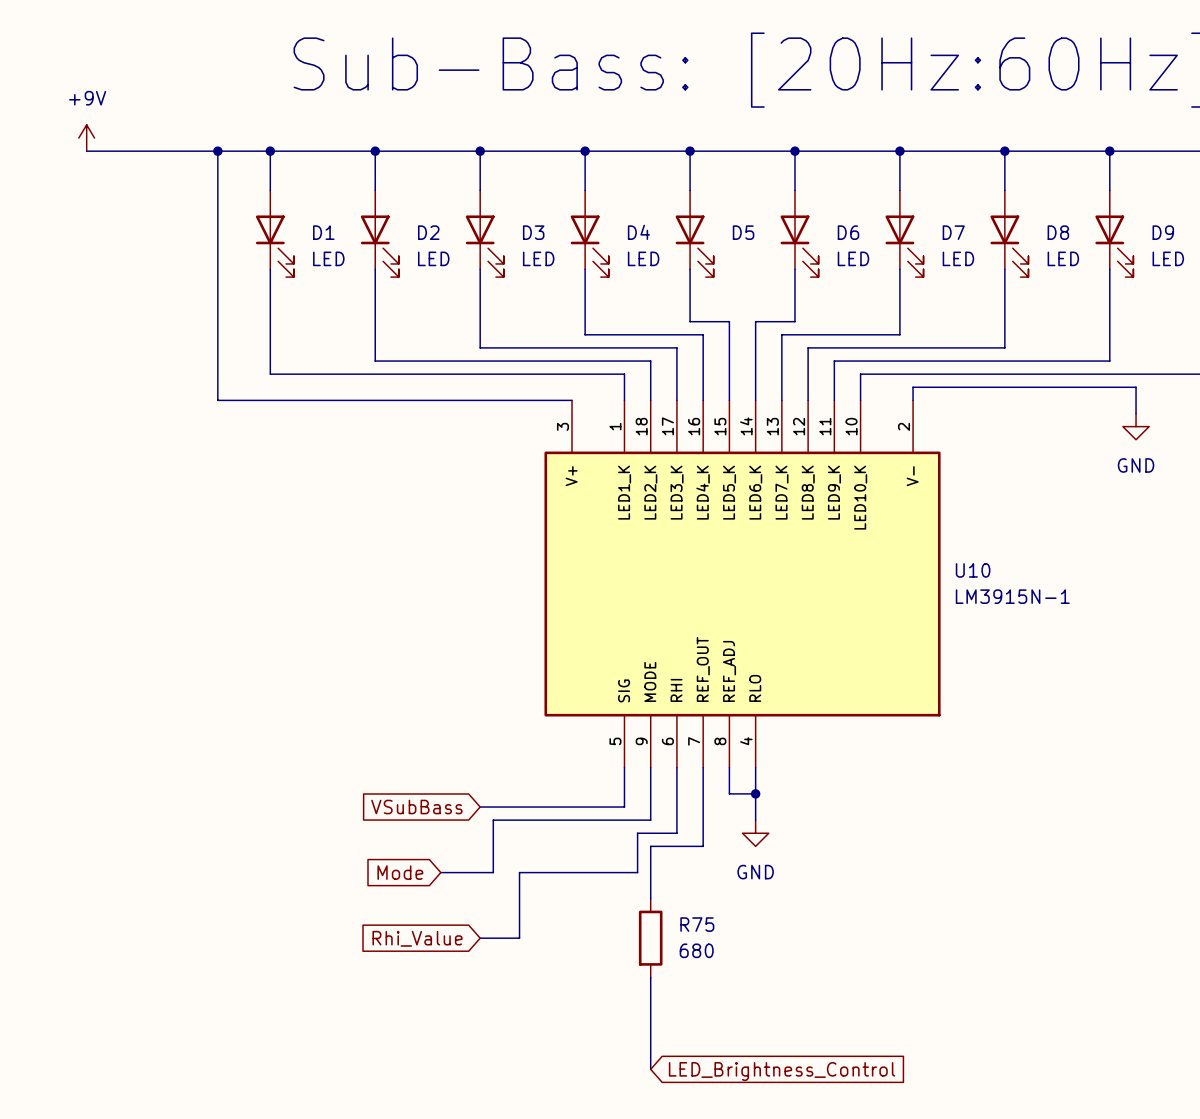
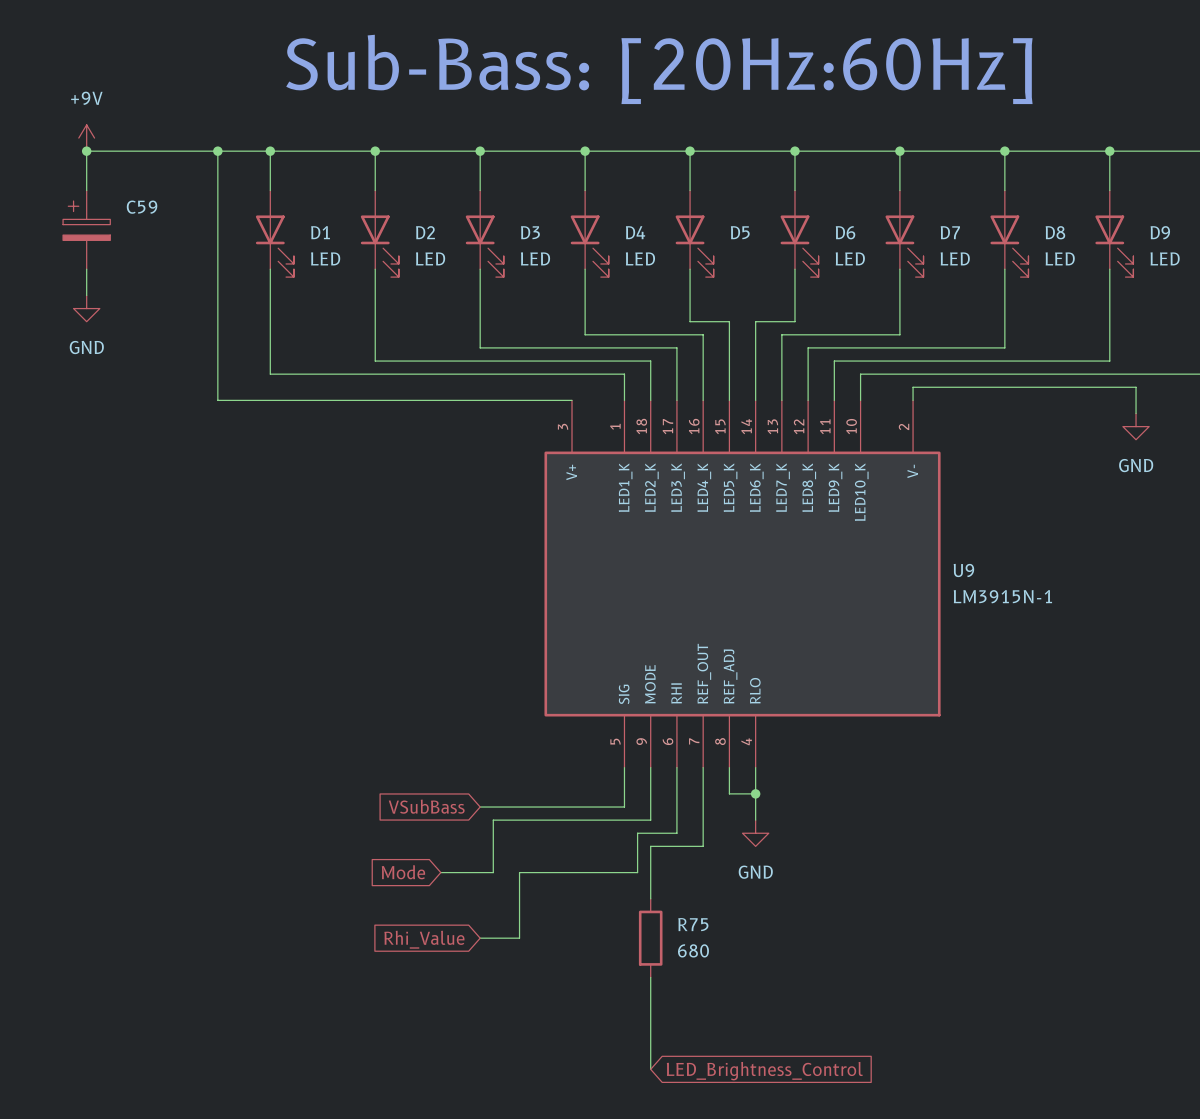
wire: none -> (86, 151) (86, 190)
junction: none -> (86, 151)
C59: none -> (86, 229)
wire: none -> (86, 269) (86, 295)
power symbol: none -> GND (86, 308)
U10 name: U10 (973, 570) -> U9 (963, 570)

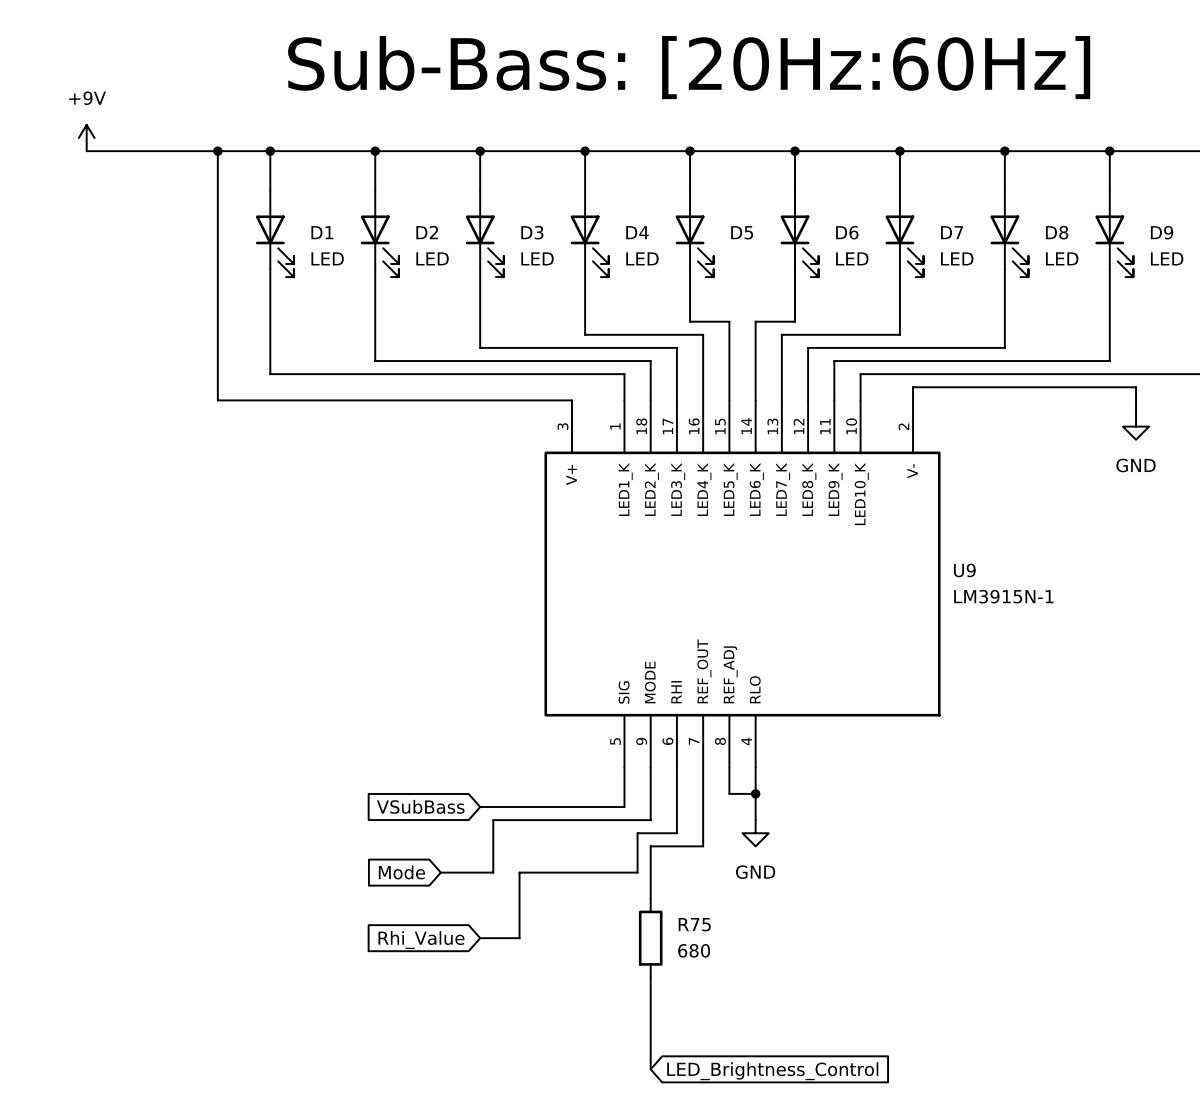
wire: (86, 151) (86, 190) -> none
junction: (86, 151) -> none
C59: (86, 229) -> none
wire: (86, 269) (86, 295) -> none
power symbol: GND (86, 308) -> none

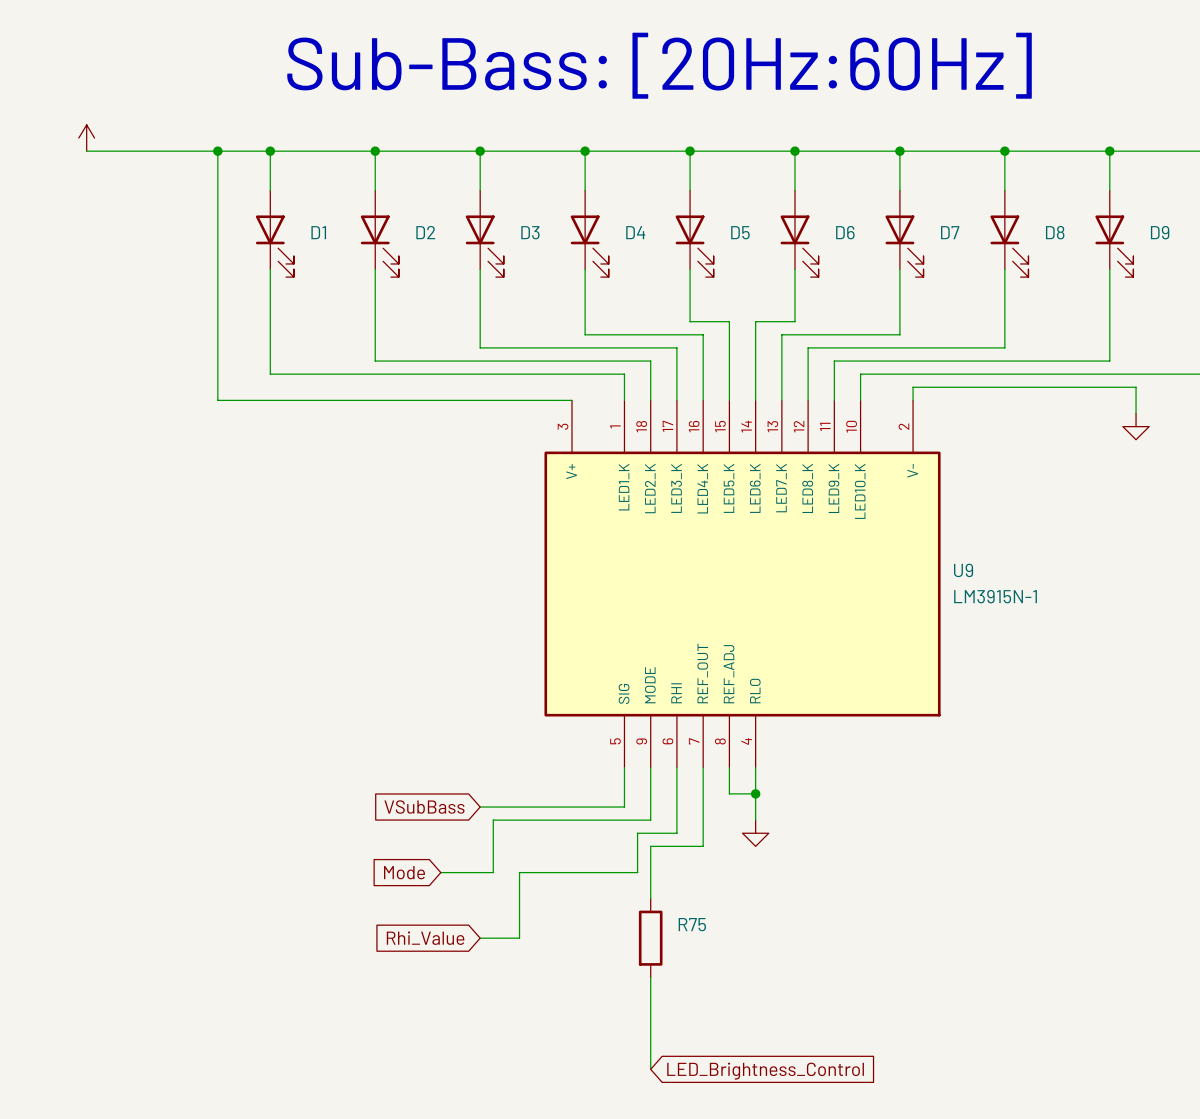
power symbol text: +9V (87, 98) -> none
D1 value: LED (327, 258) -> none
D2 value: LED (432, 258) -> none
D3 value: LED (537, 258) -> none
D4 value: LED (642, 258) -> none
D6 value: LED (852, 258) -> none
D7 value: LED (957, 258) -> none
D8 value: LED (1062, 258) -> none
D9 value: LED (1167, 258) -> none
power symbol text: GND (1136, 465) -> none
power symbol text: GND (755, 872) -> none
R75 value: 680 (694, 950) -> none

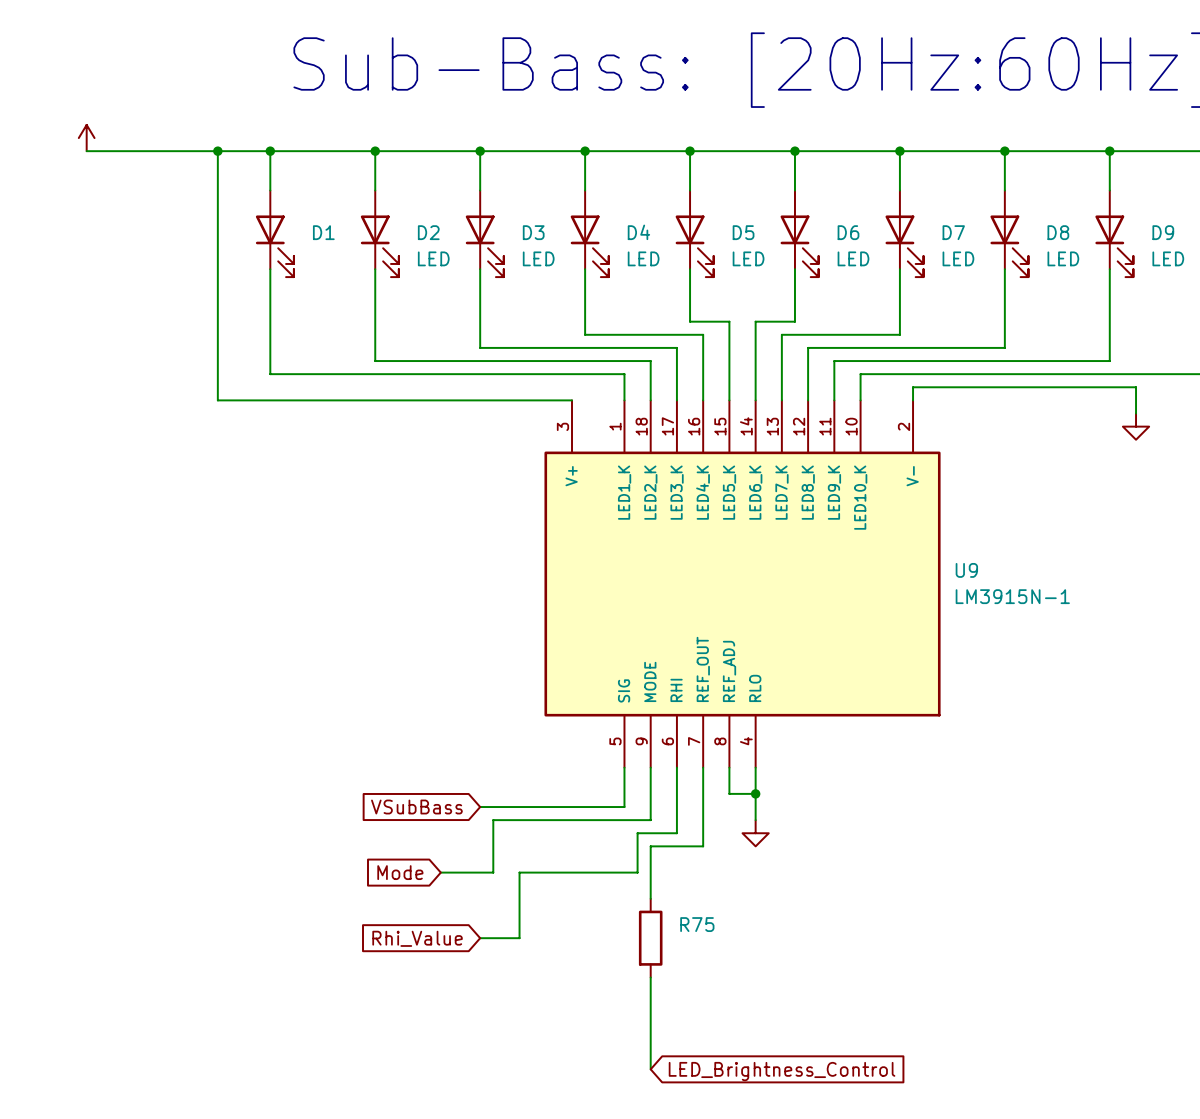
D2 value: none -> LED (433, 258)
D3 value: none -> LED (538, 258)
D4 value: none -> LED (643, 258)
D5 value: none -> LED (748, 258)
D6 value: none -> LED (853, 258)
D7 value: none -> LED (958, 258)
D8 value: none -> LED (1063, 258)
D9 value: none -> LED (1168, 258)

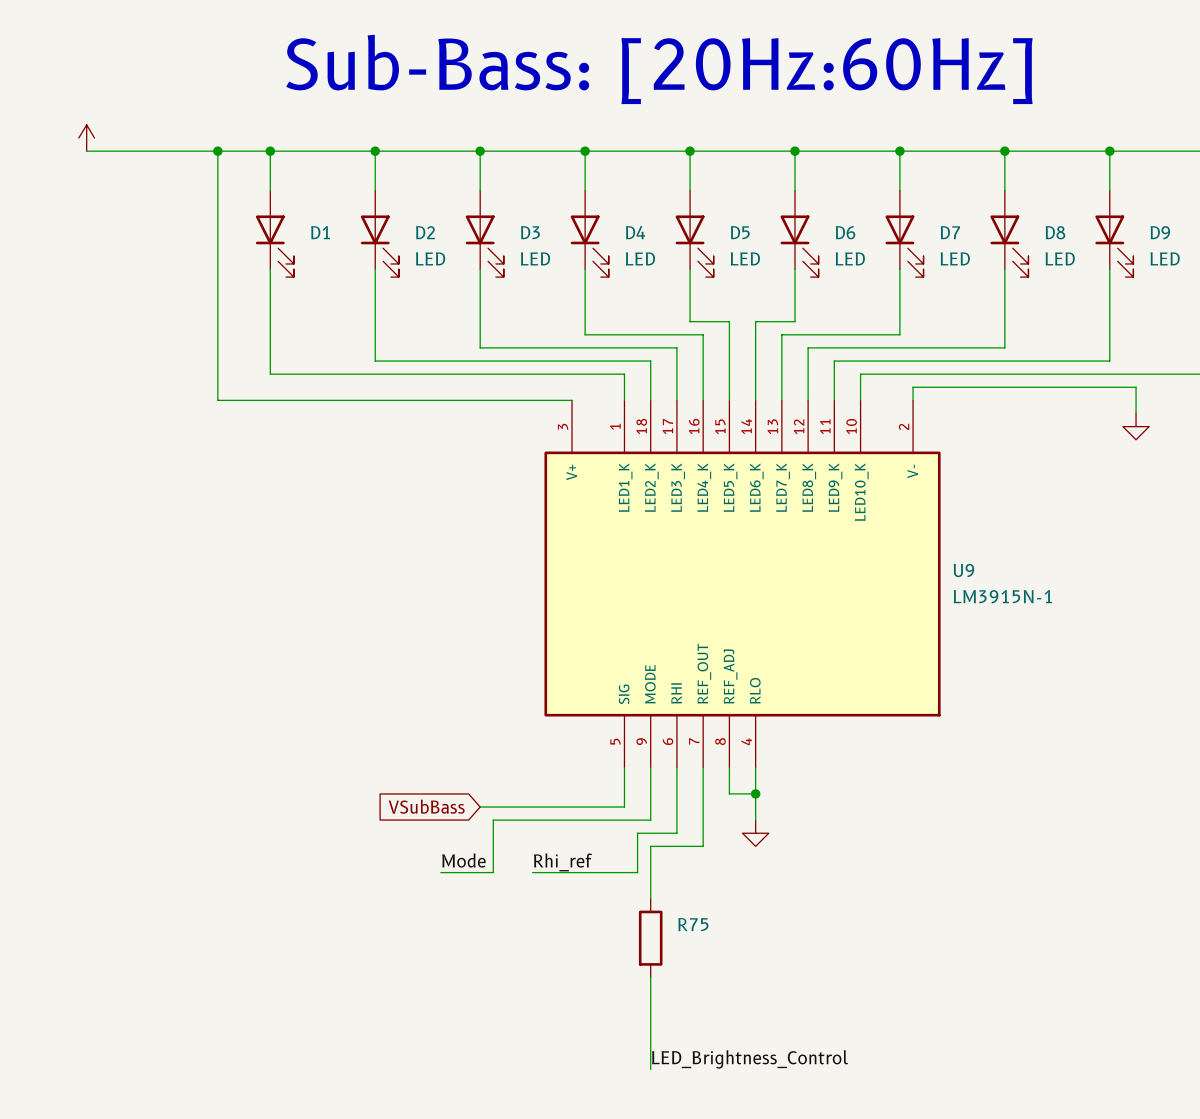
label: none -> Mode (463, 860)
label: none -> Rhi_ref (563, 862)
global label: Mode (400, 872) -> none
wire: (532, 872) (519, 872) (519, 938) (480, 938) -> none
global label: Rhi_Value (417, 938) -> none
label: none -> LED_Brightness_Control (750, 1059)
global label: LED_Brightness_Control (782, 1071) -> none

